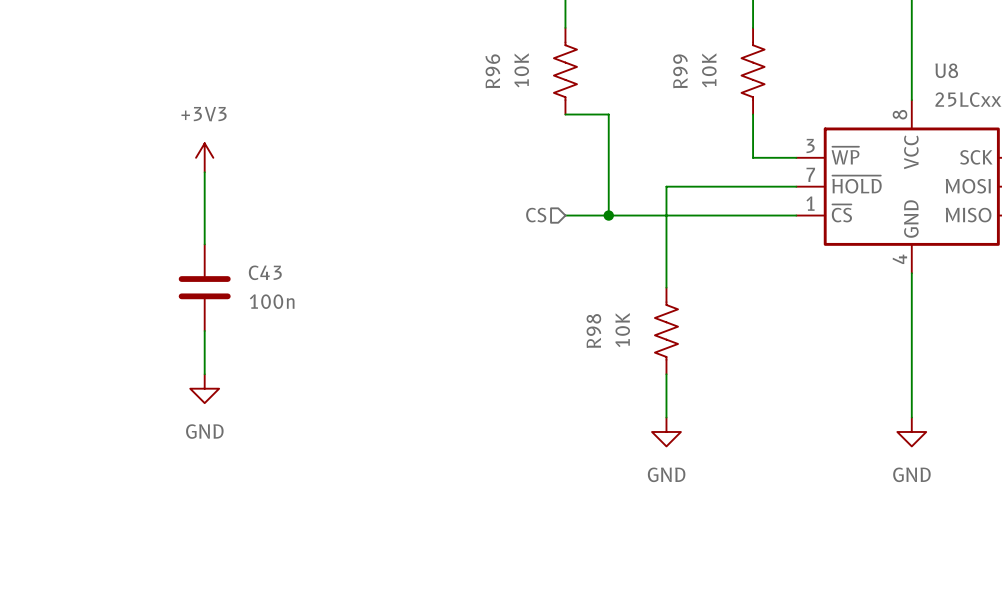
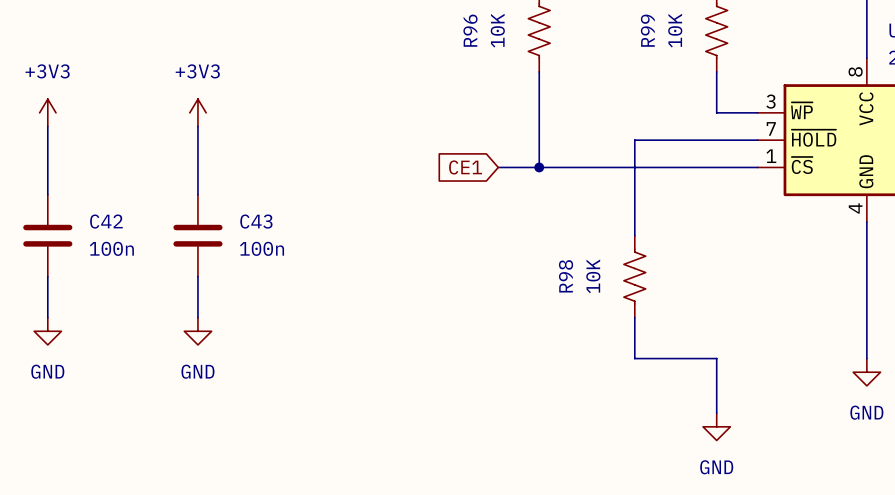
wire: (565, 114) (608, 114) (608, 215) -> (539, 71) (539, 167) (498, 167)
power symbol: none -> +3V3 (47, 112)
wire: none -> (47, 126) (47, 194)
global label: none -> CE1 (465, 167)
hierarchical label: CS (536, 215) -> none
junction position: (608, 215) -> (539, 167)
C42: none -> 100n (47, 235)
wire: none -> (47, 276) (47, 317)
power symbol: none -> GND (47, 331)
wire: none -> (634, 358) (716, 358) (716, 413)
power symbol position: GND (666, 431) -> GND (716, 426)

